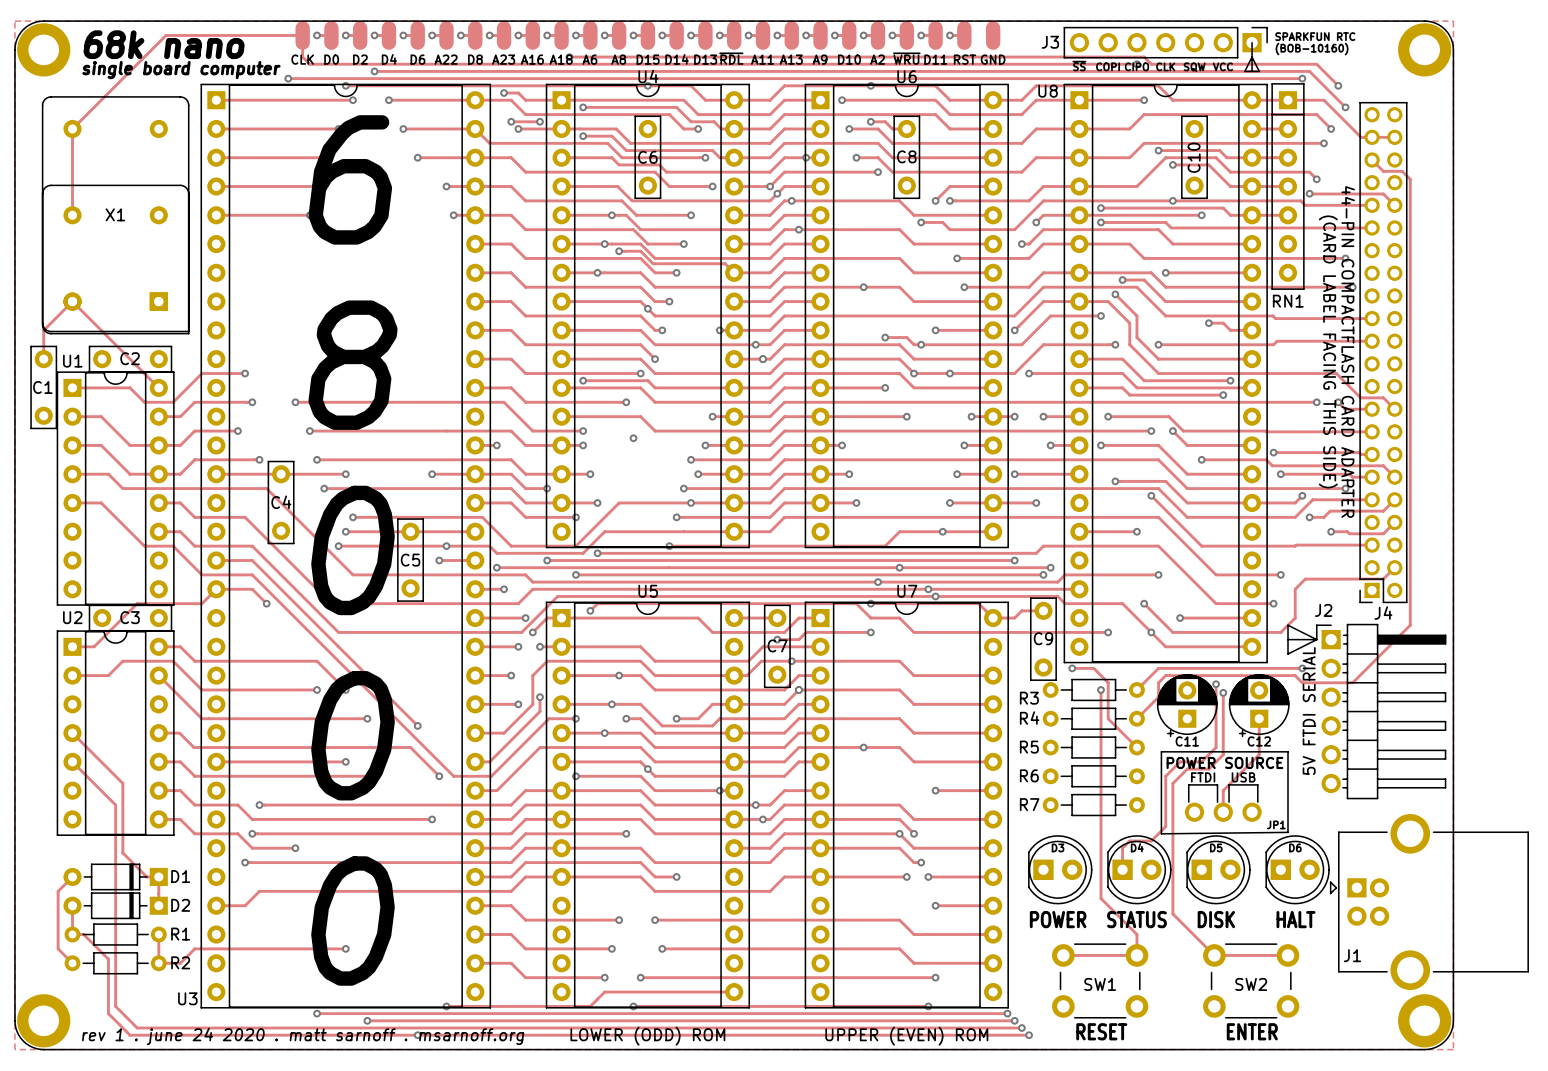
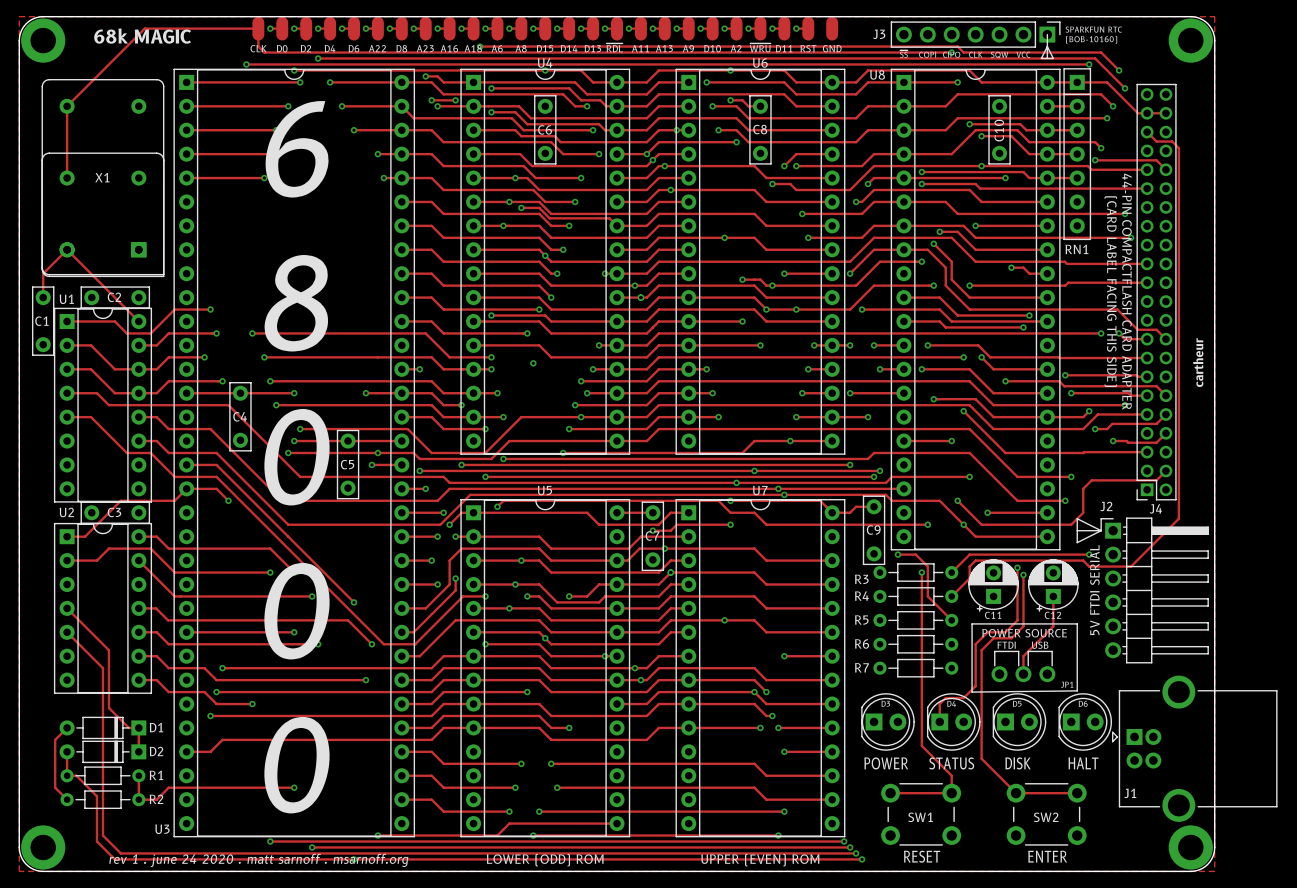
text: 68k nano (164, 44) -> 68k MAGIC (142, 36)
text: single board computer (181, 70) -> none
text: none -> cartheur (1198, 362)

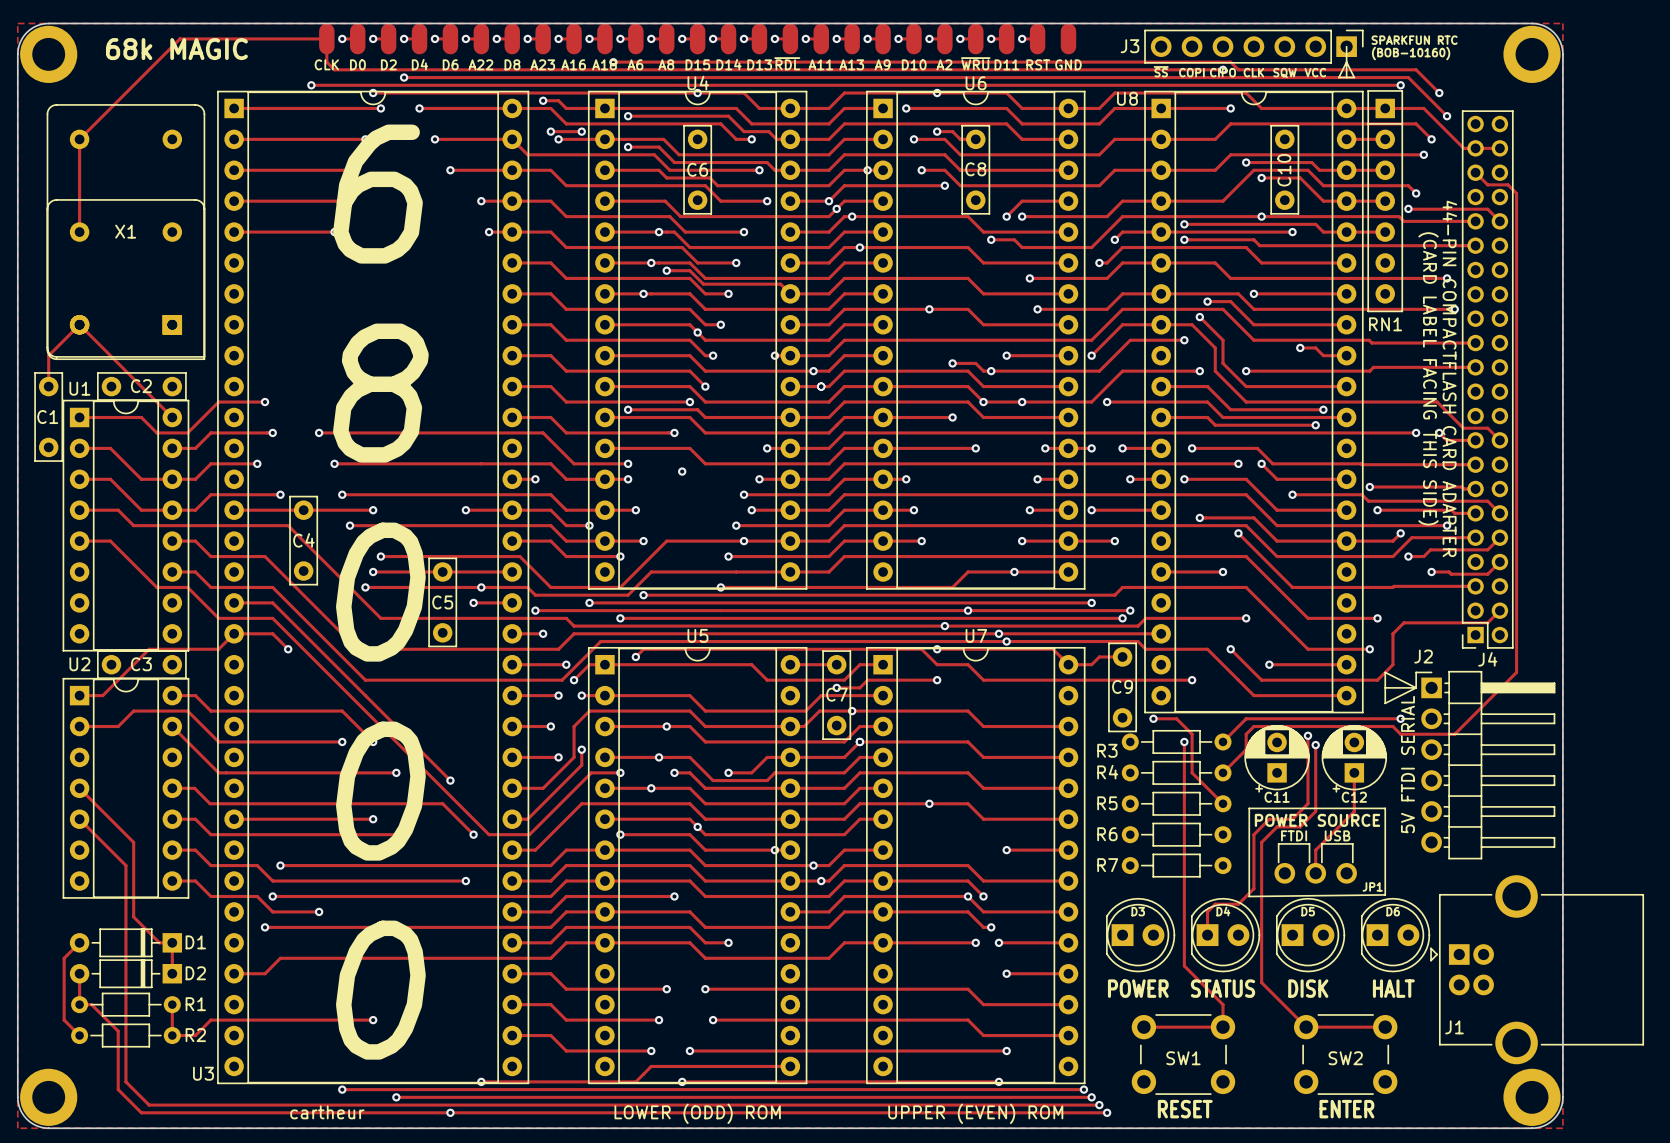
text: cartheur (1198, 362) -> none
via: (963, 524) -> none
text: rev 1 . june 24 2020 . matt sarnoff . msarnoff.org (258, 860) -> cartheur (327, 1112)

